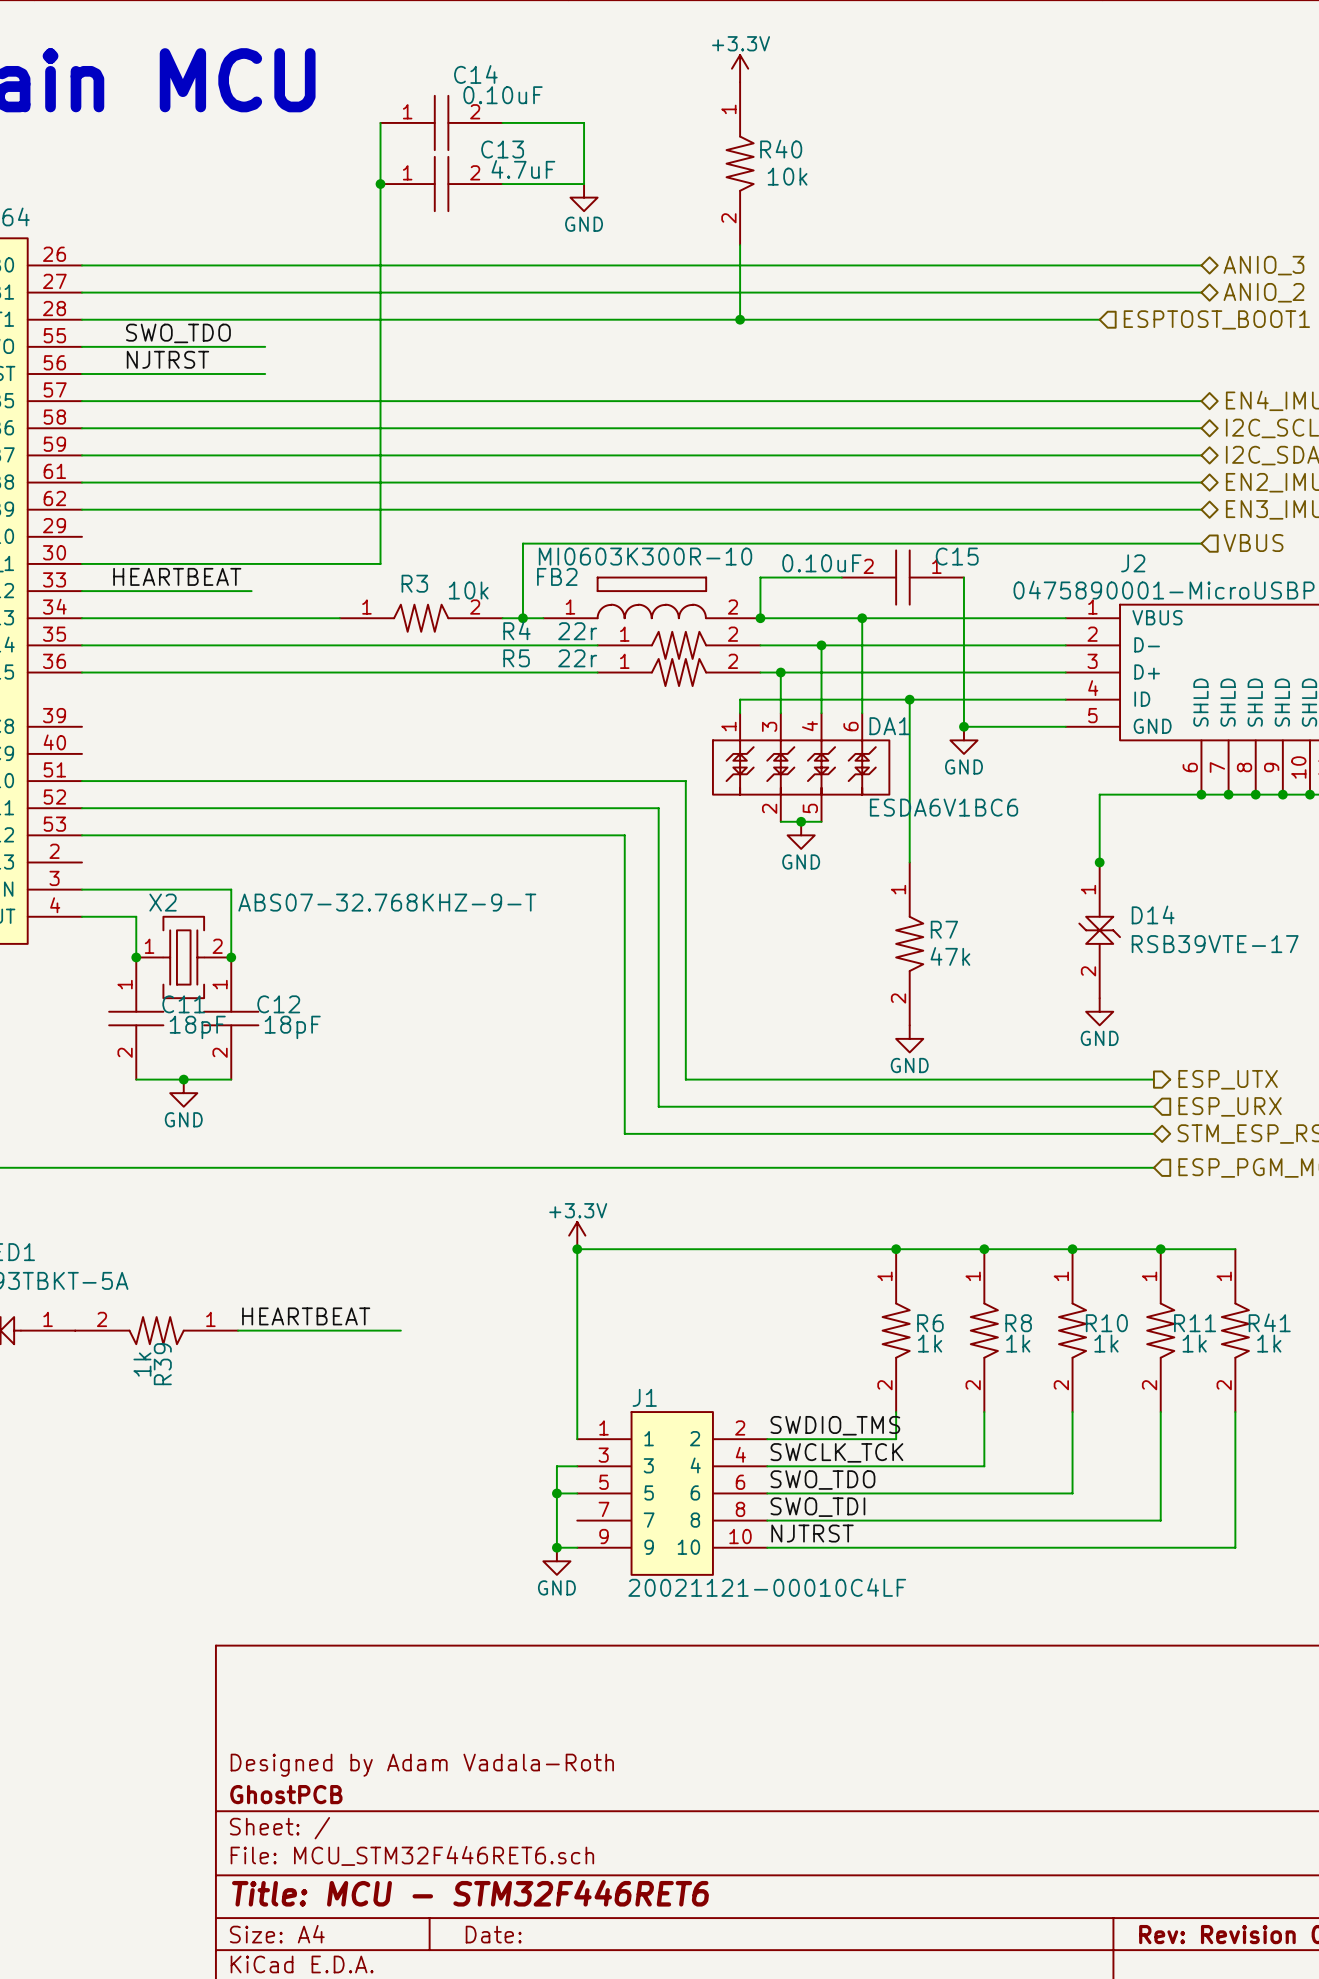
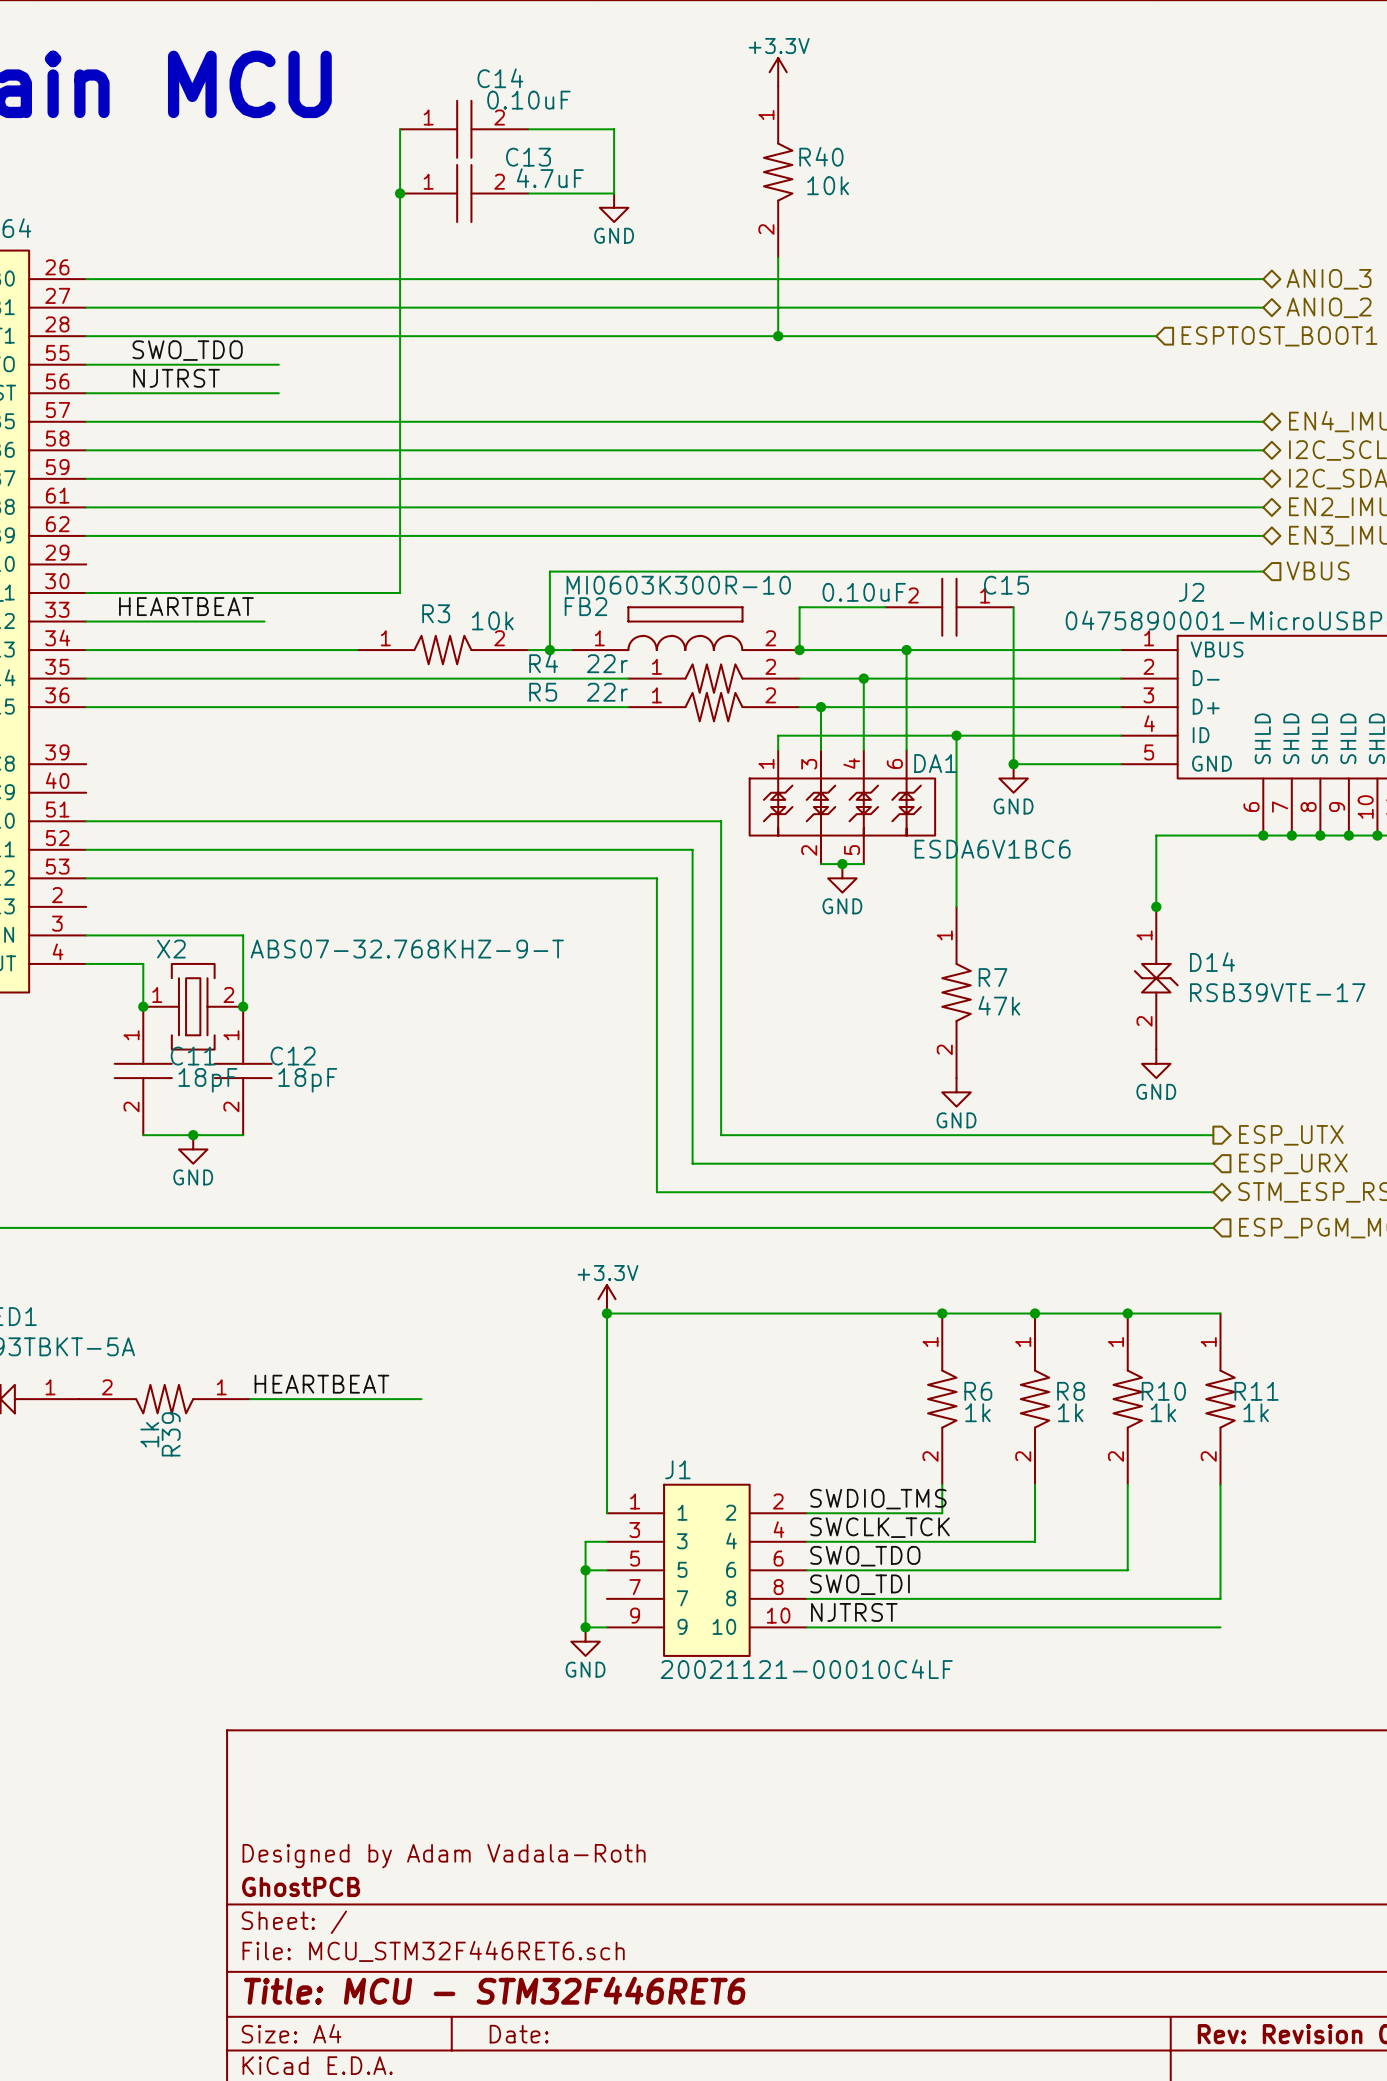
wire: (1160, 1249) (1235, 1249) -> none
junction: (1160, 1249) -> none
R41: (1235, 1330) -> none
wire: (1235, 1412) (1235, 1547) (1160, 1547) -> none

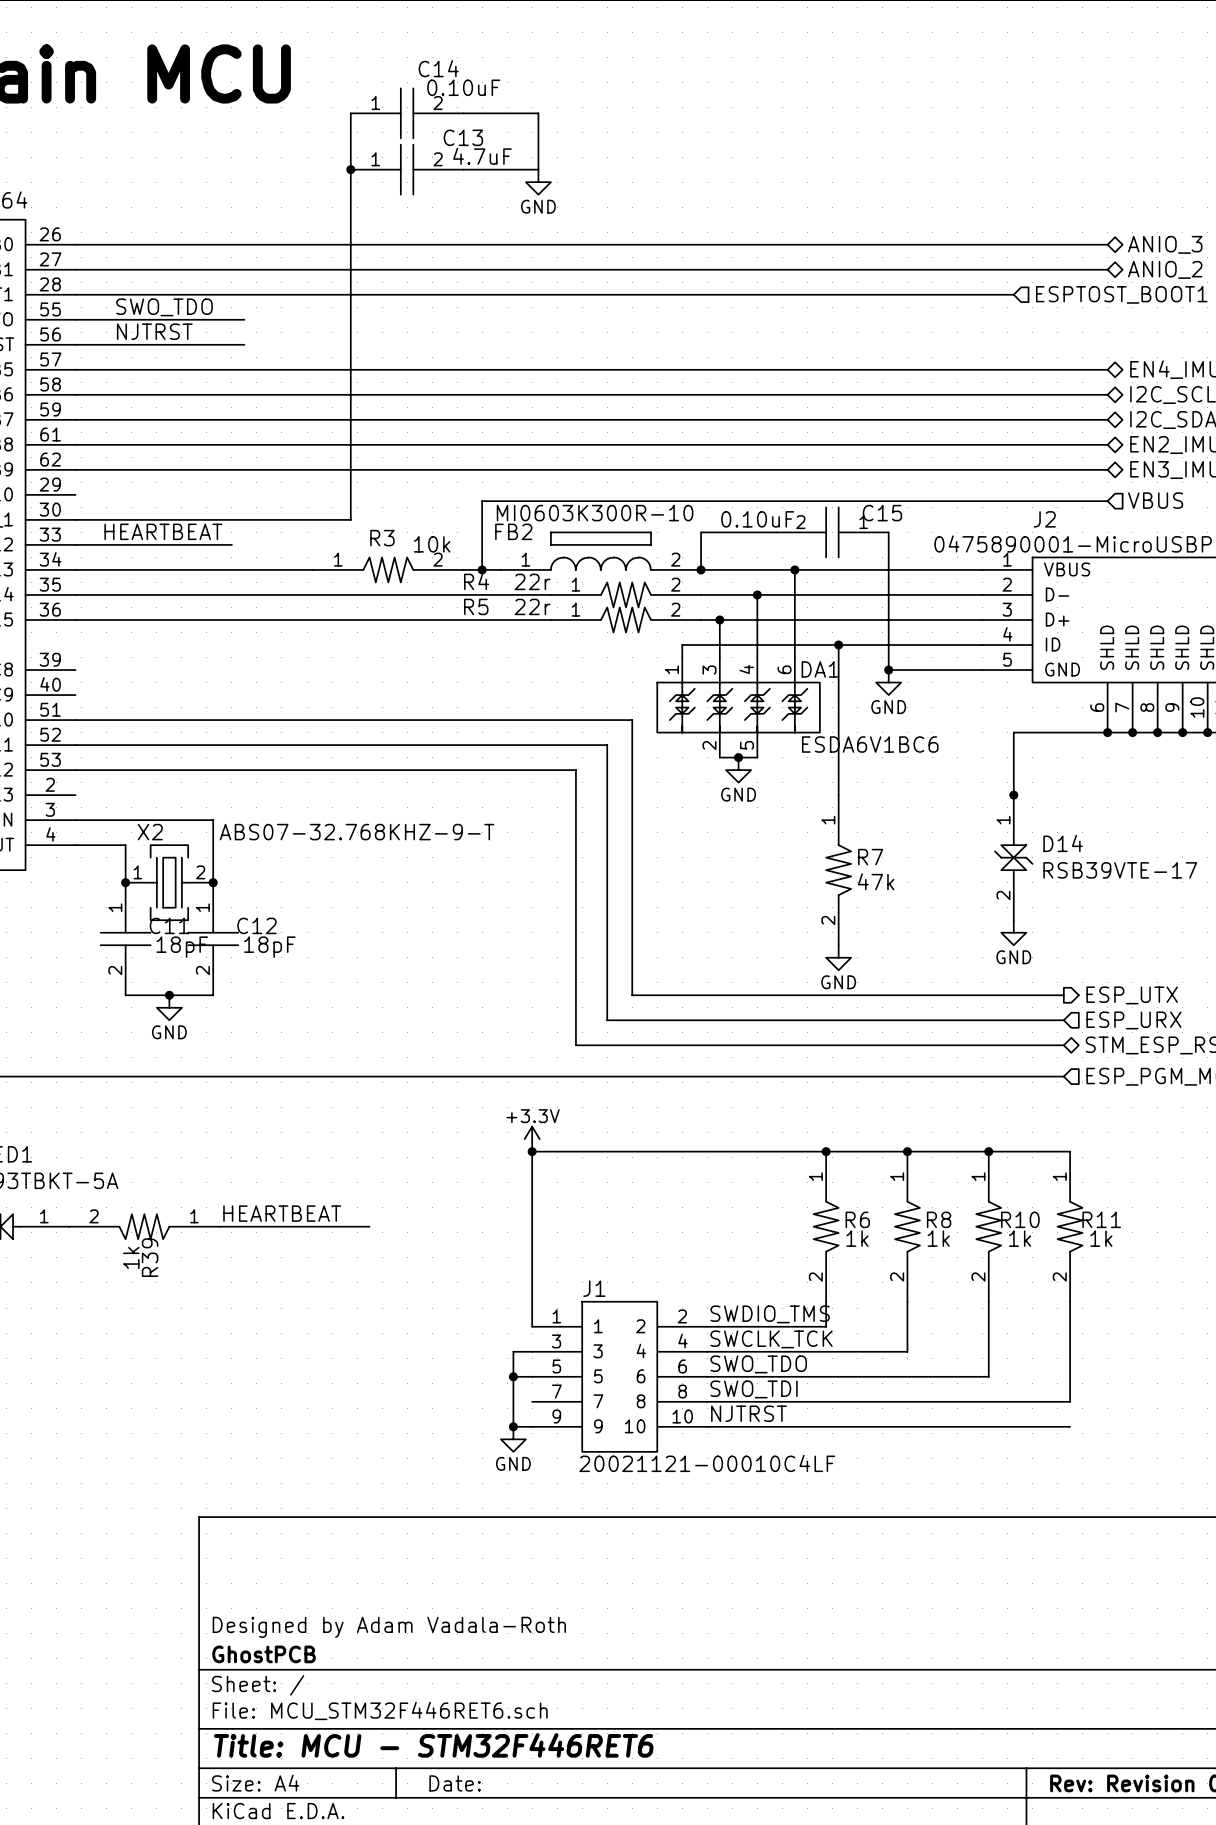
power symbol: +3.3V (778, 72) -> none
R40: (778, 172) -> none
wire: (778, 257) (778, 336) -> none
junction: (778, 336) -> none

